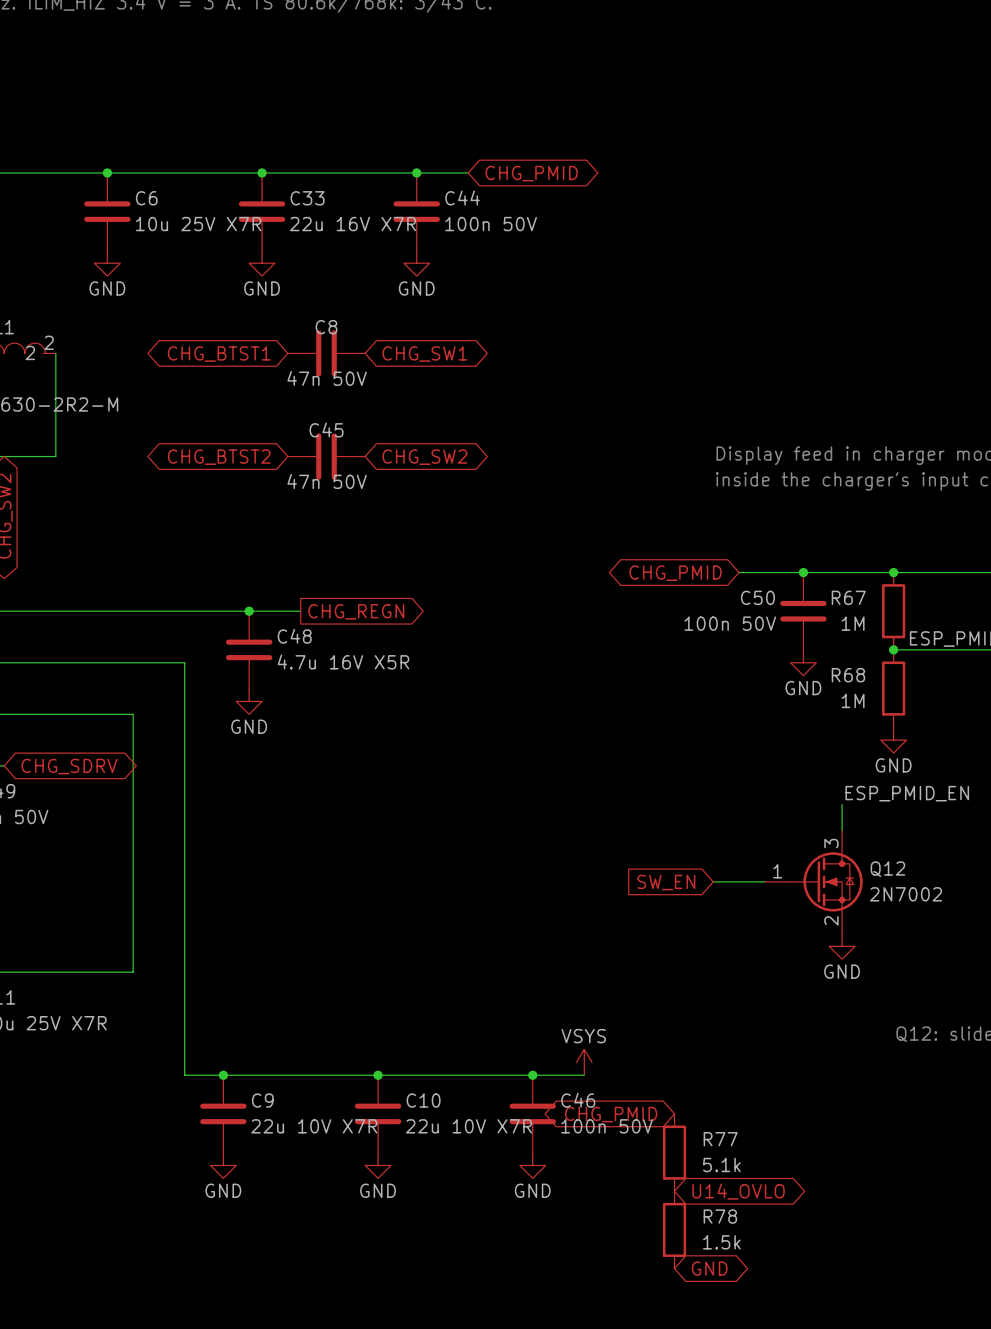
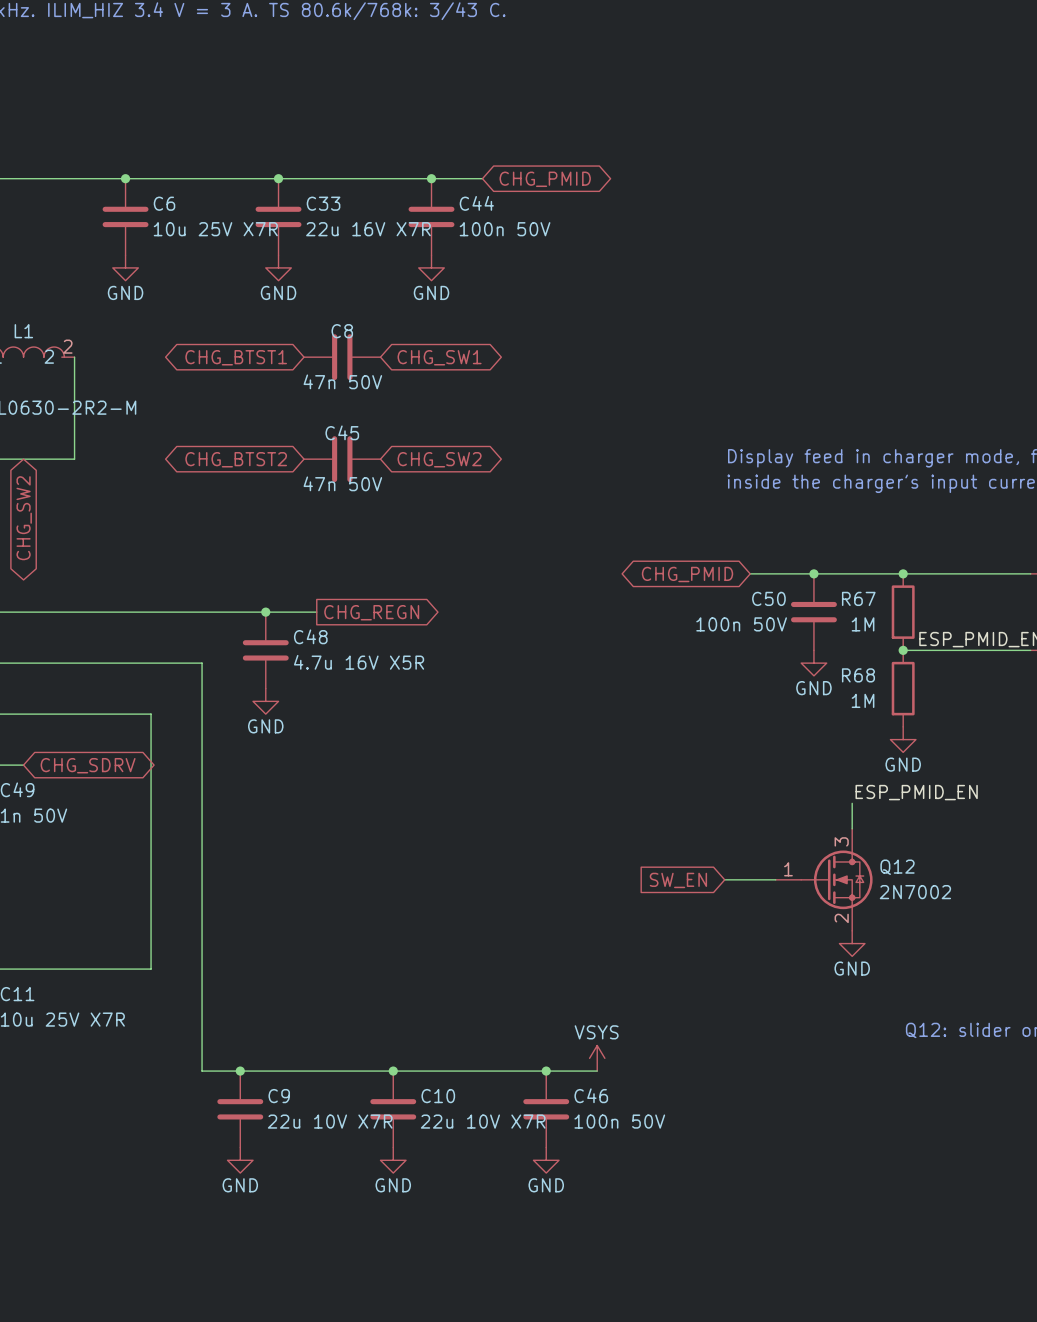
global label: CHG_PMID (611, 1114) -> none
R77: 5.1k (674, 1152) -> none
global label: U14_OVLO (738, 1191) -> none
R78: 1.5k (674, 1229) -> none
global label: GND (709, 1268) -> none

